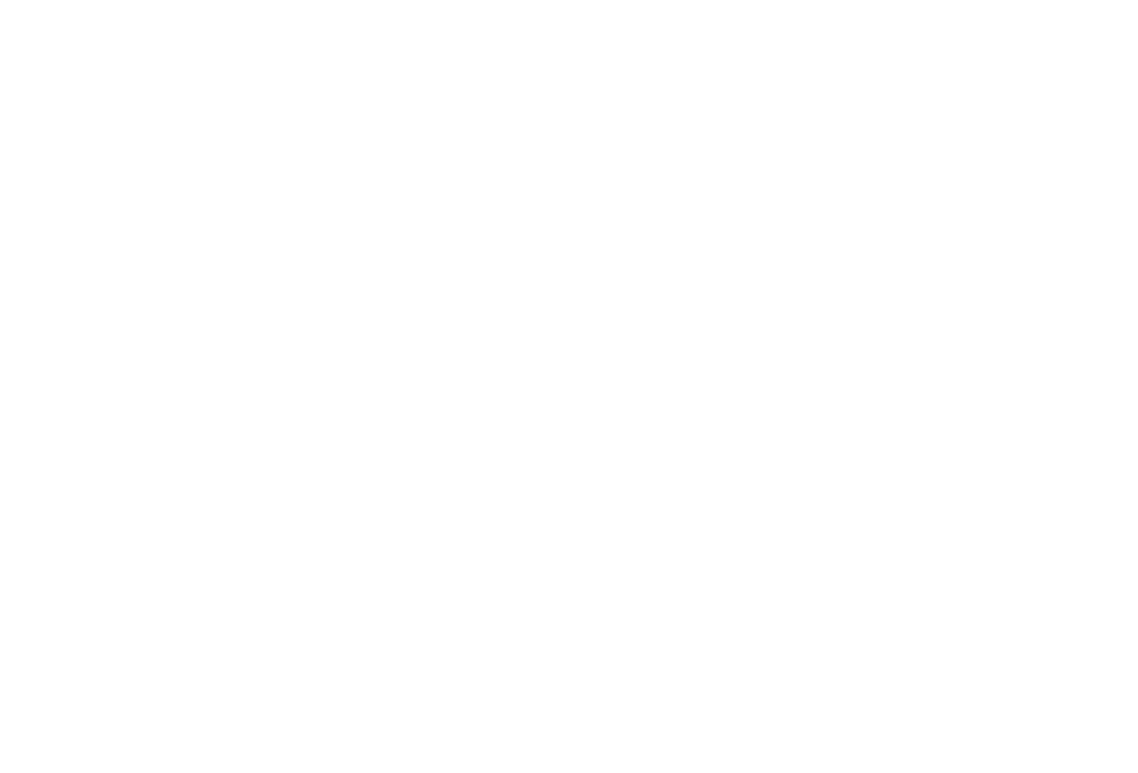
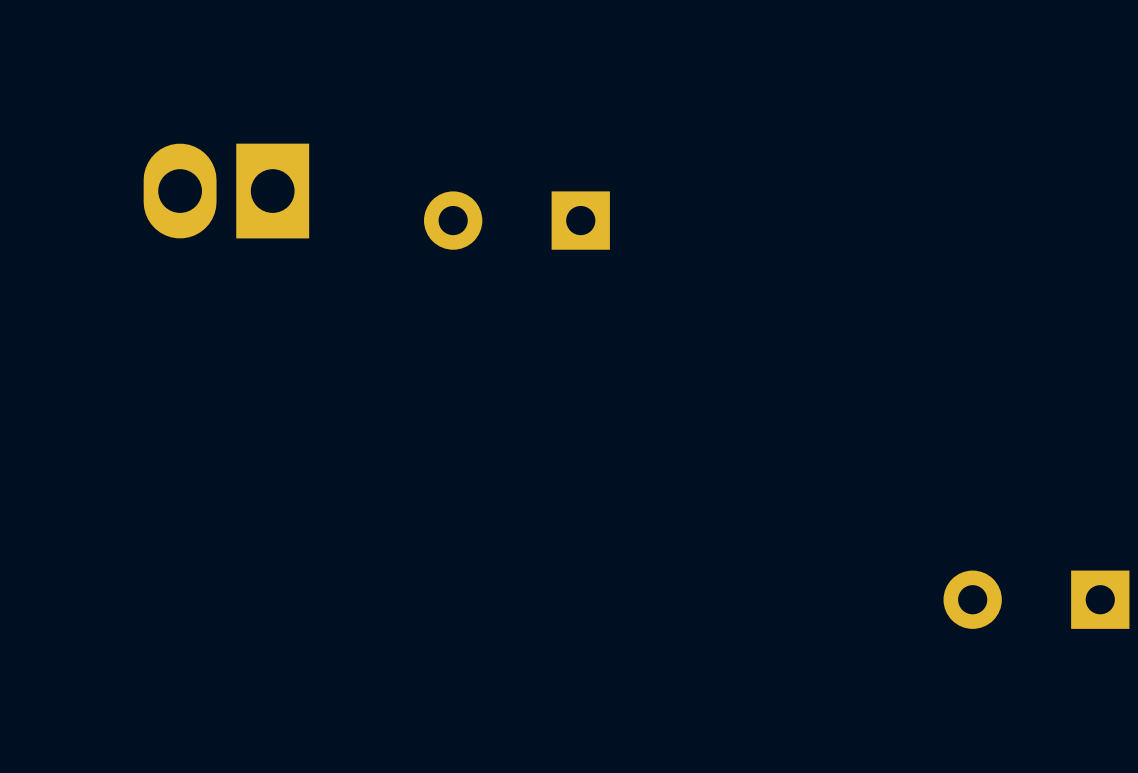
part: none -> (226, 191)
part: none -> (516, 220)
part: none -> (1036, 599)

